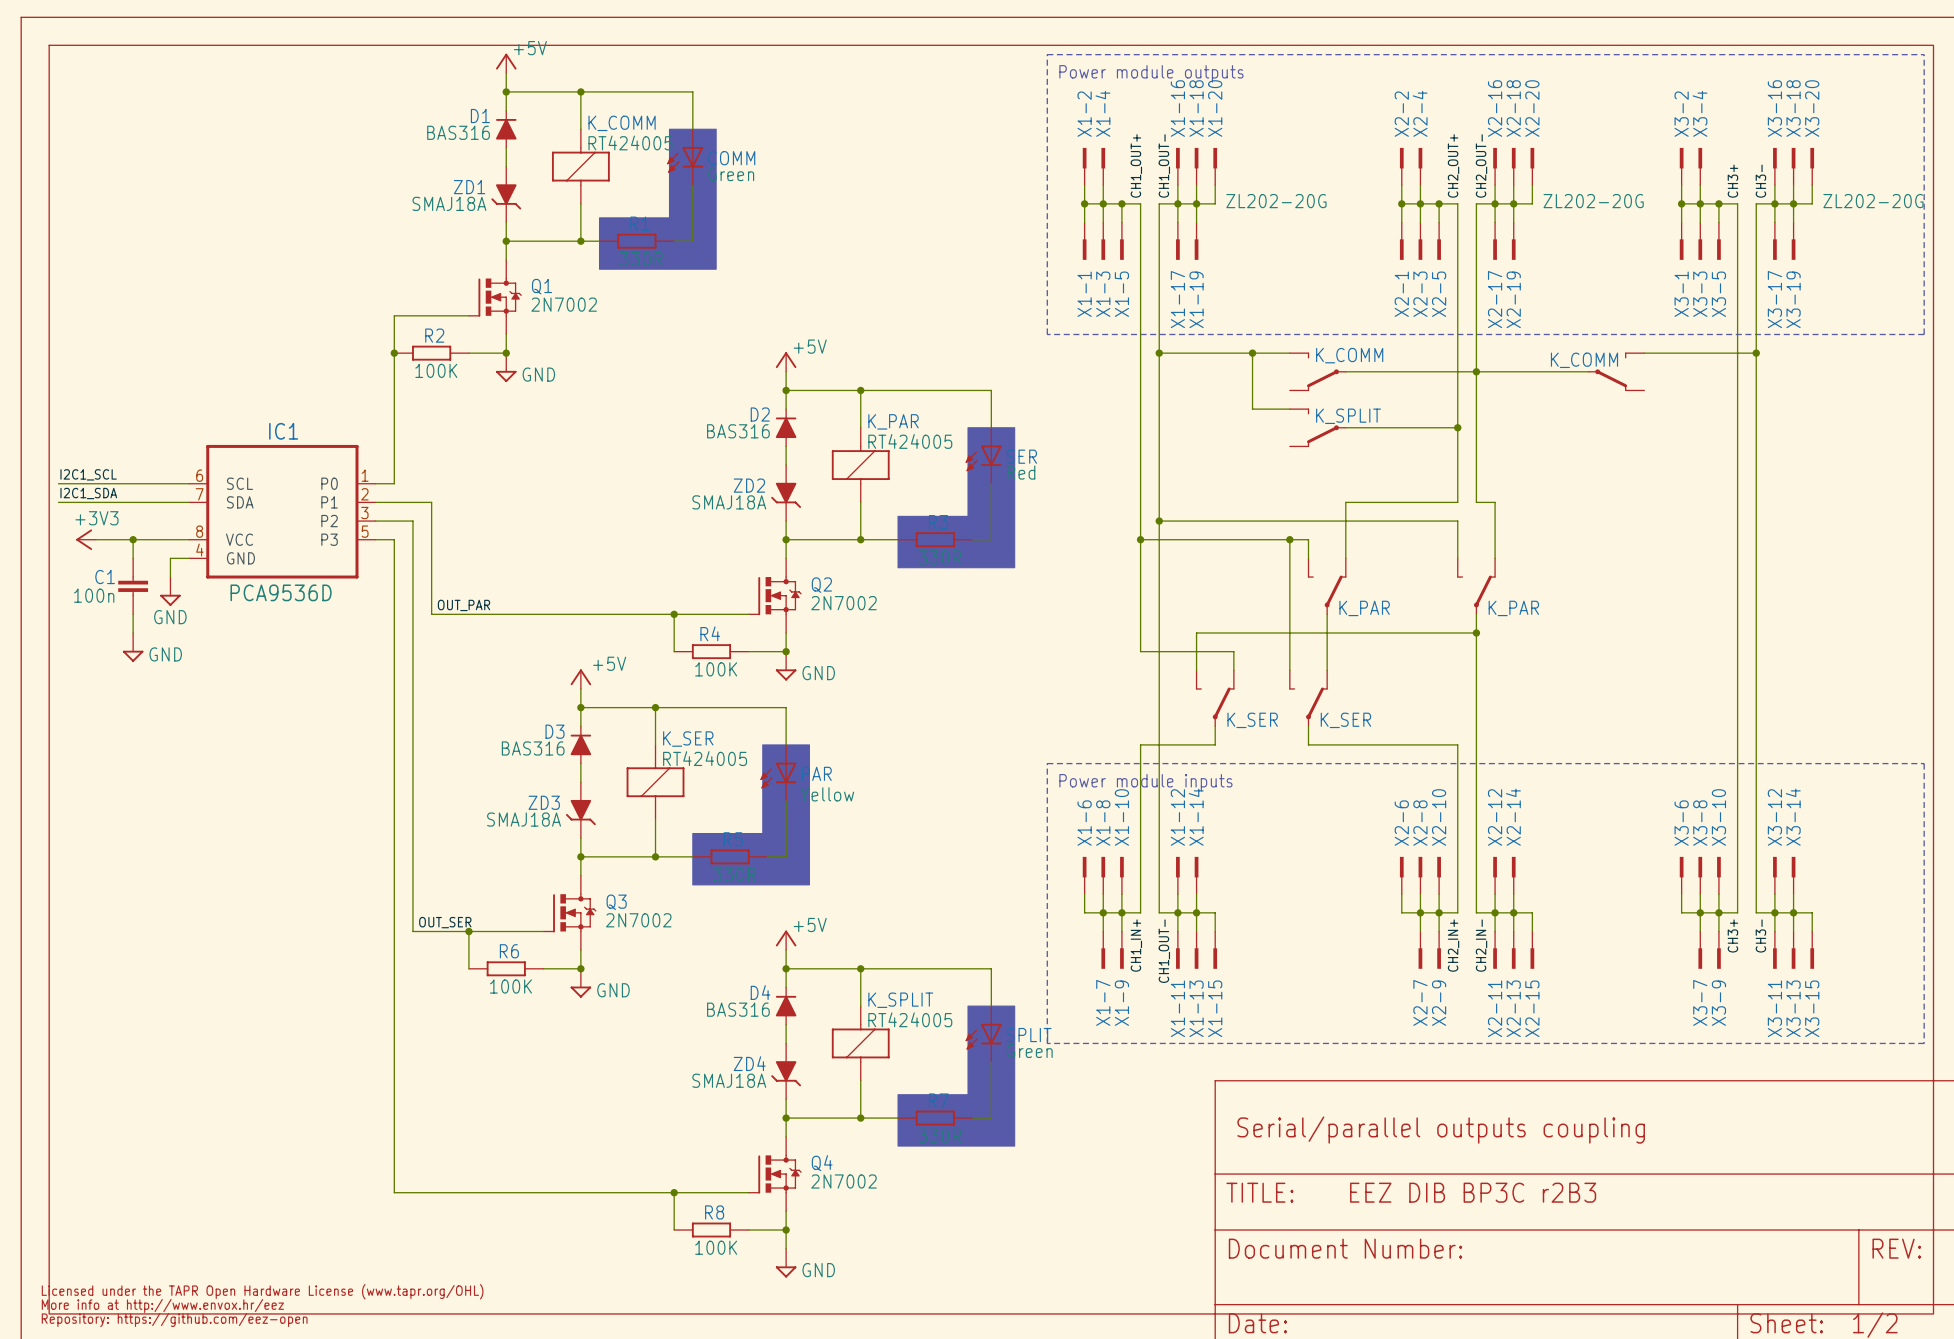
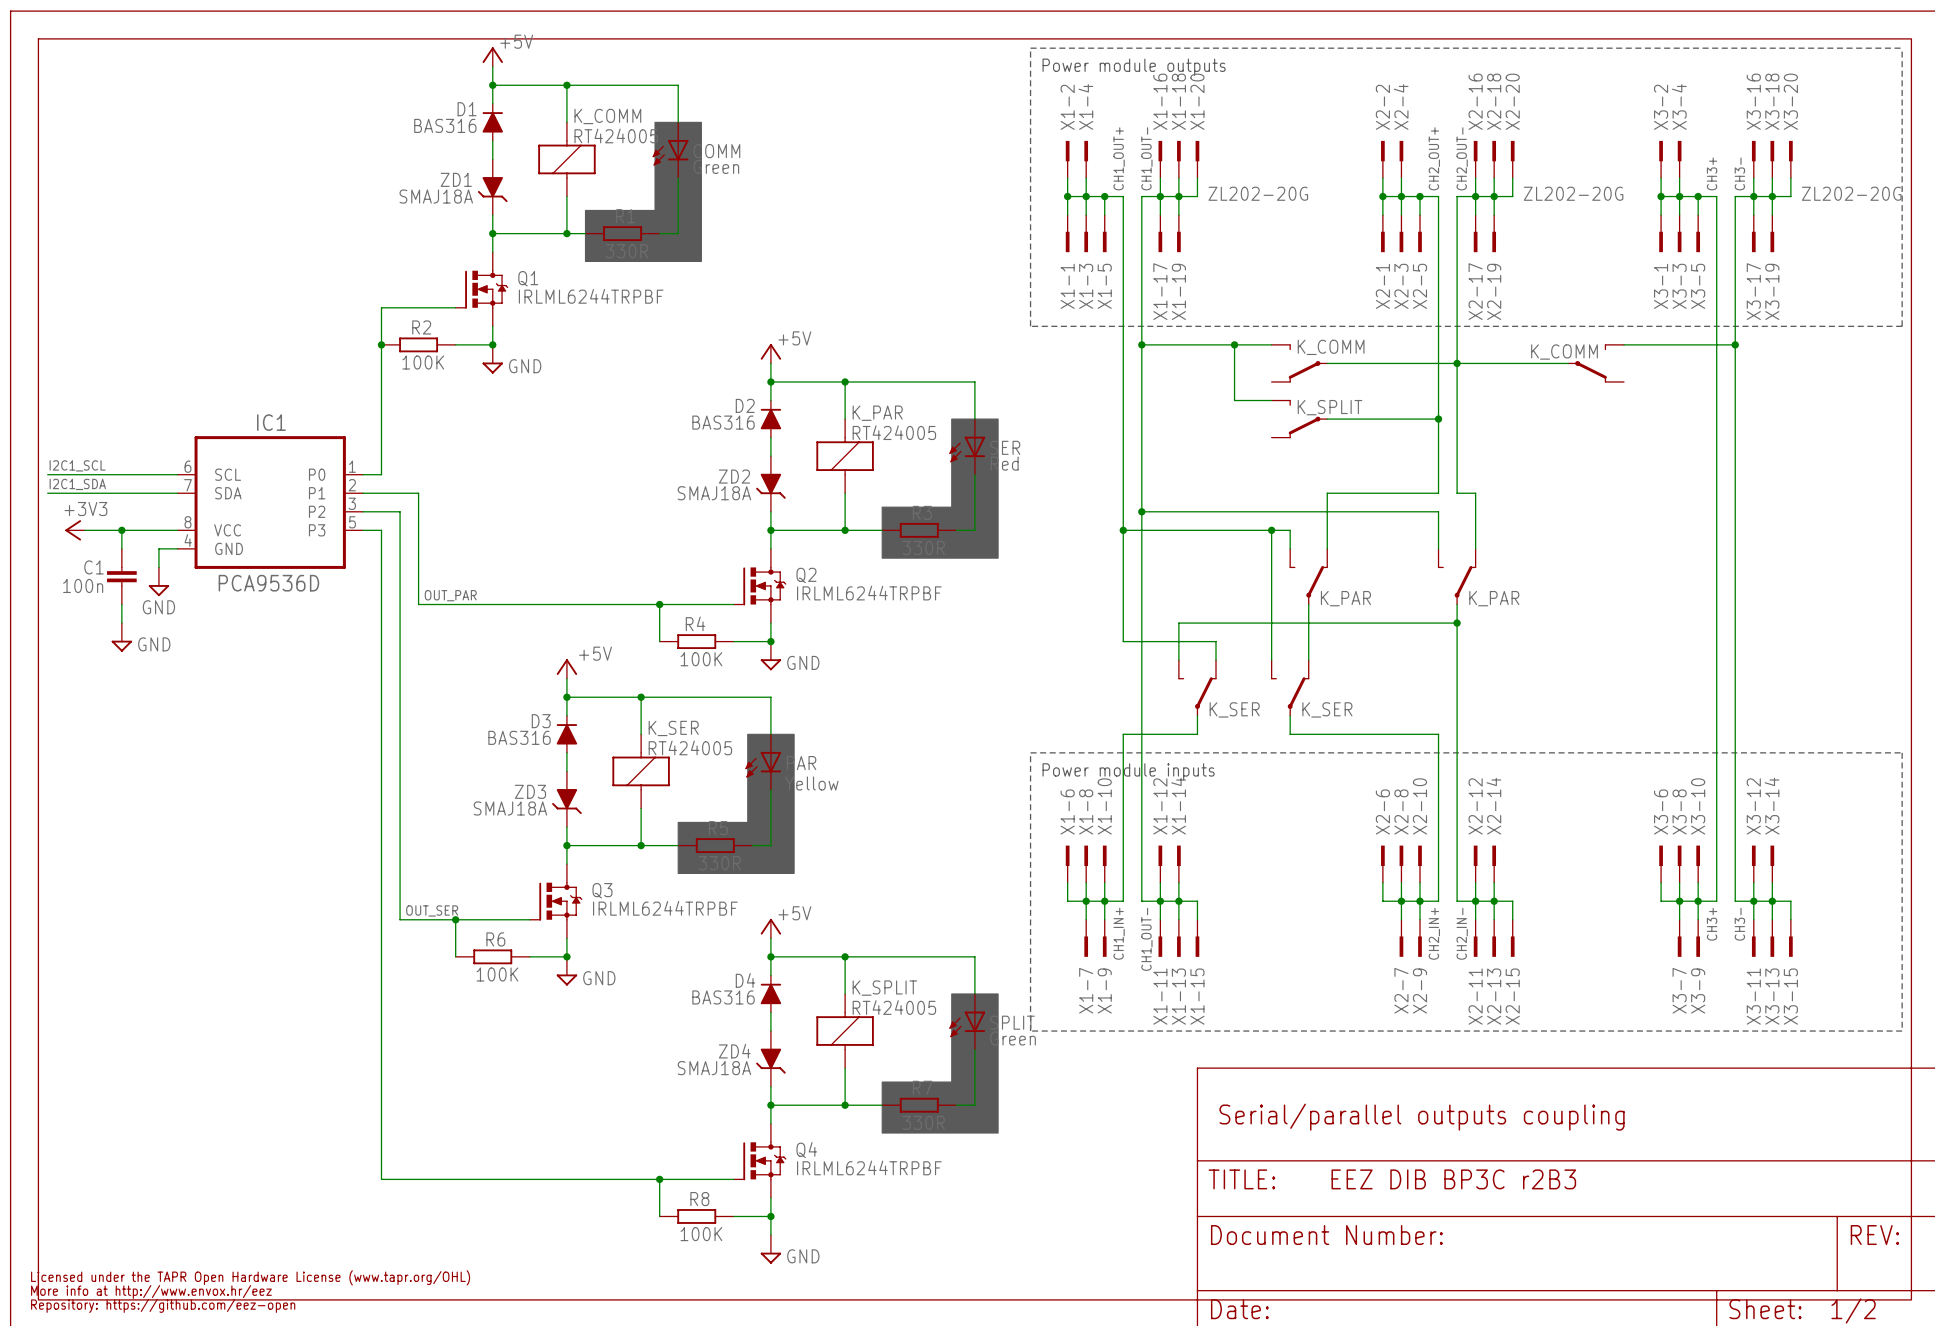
Q1 value: 2N7002 (564, 304) -> IRLML6244TRPBF (591, 296)
Q2 value: 2N7002 (843, 603) -> IRLML6244TRPBF (869, 593)
Q3 value: 2N7002 (638, 920) -> IRLML6244TRPBF (665, 908)
Q4 value: 2N7002 (843, 1181) -> IRLML6244TRPBF (869, 1167)

